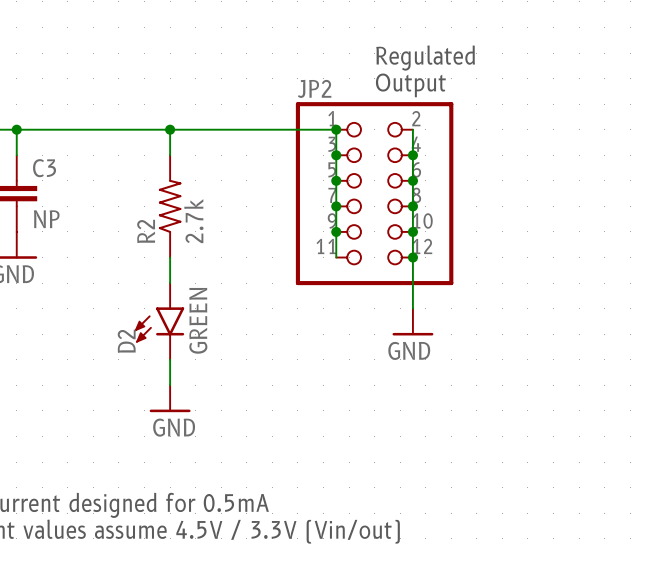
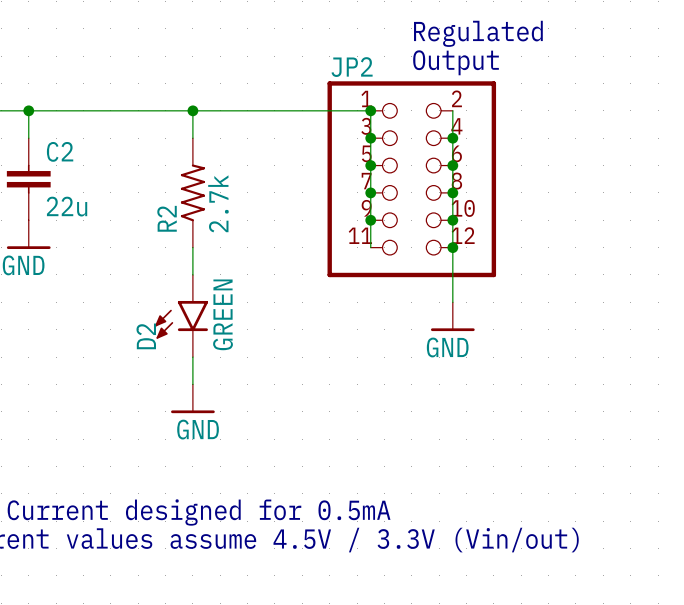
C3 name: C3 (44, 168) -> C2 (60, 151)
C3 value: NP (46, 219) -> 22u (66, 206)

